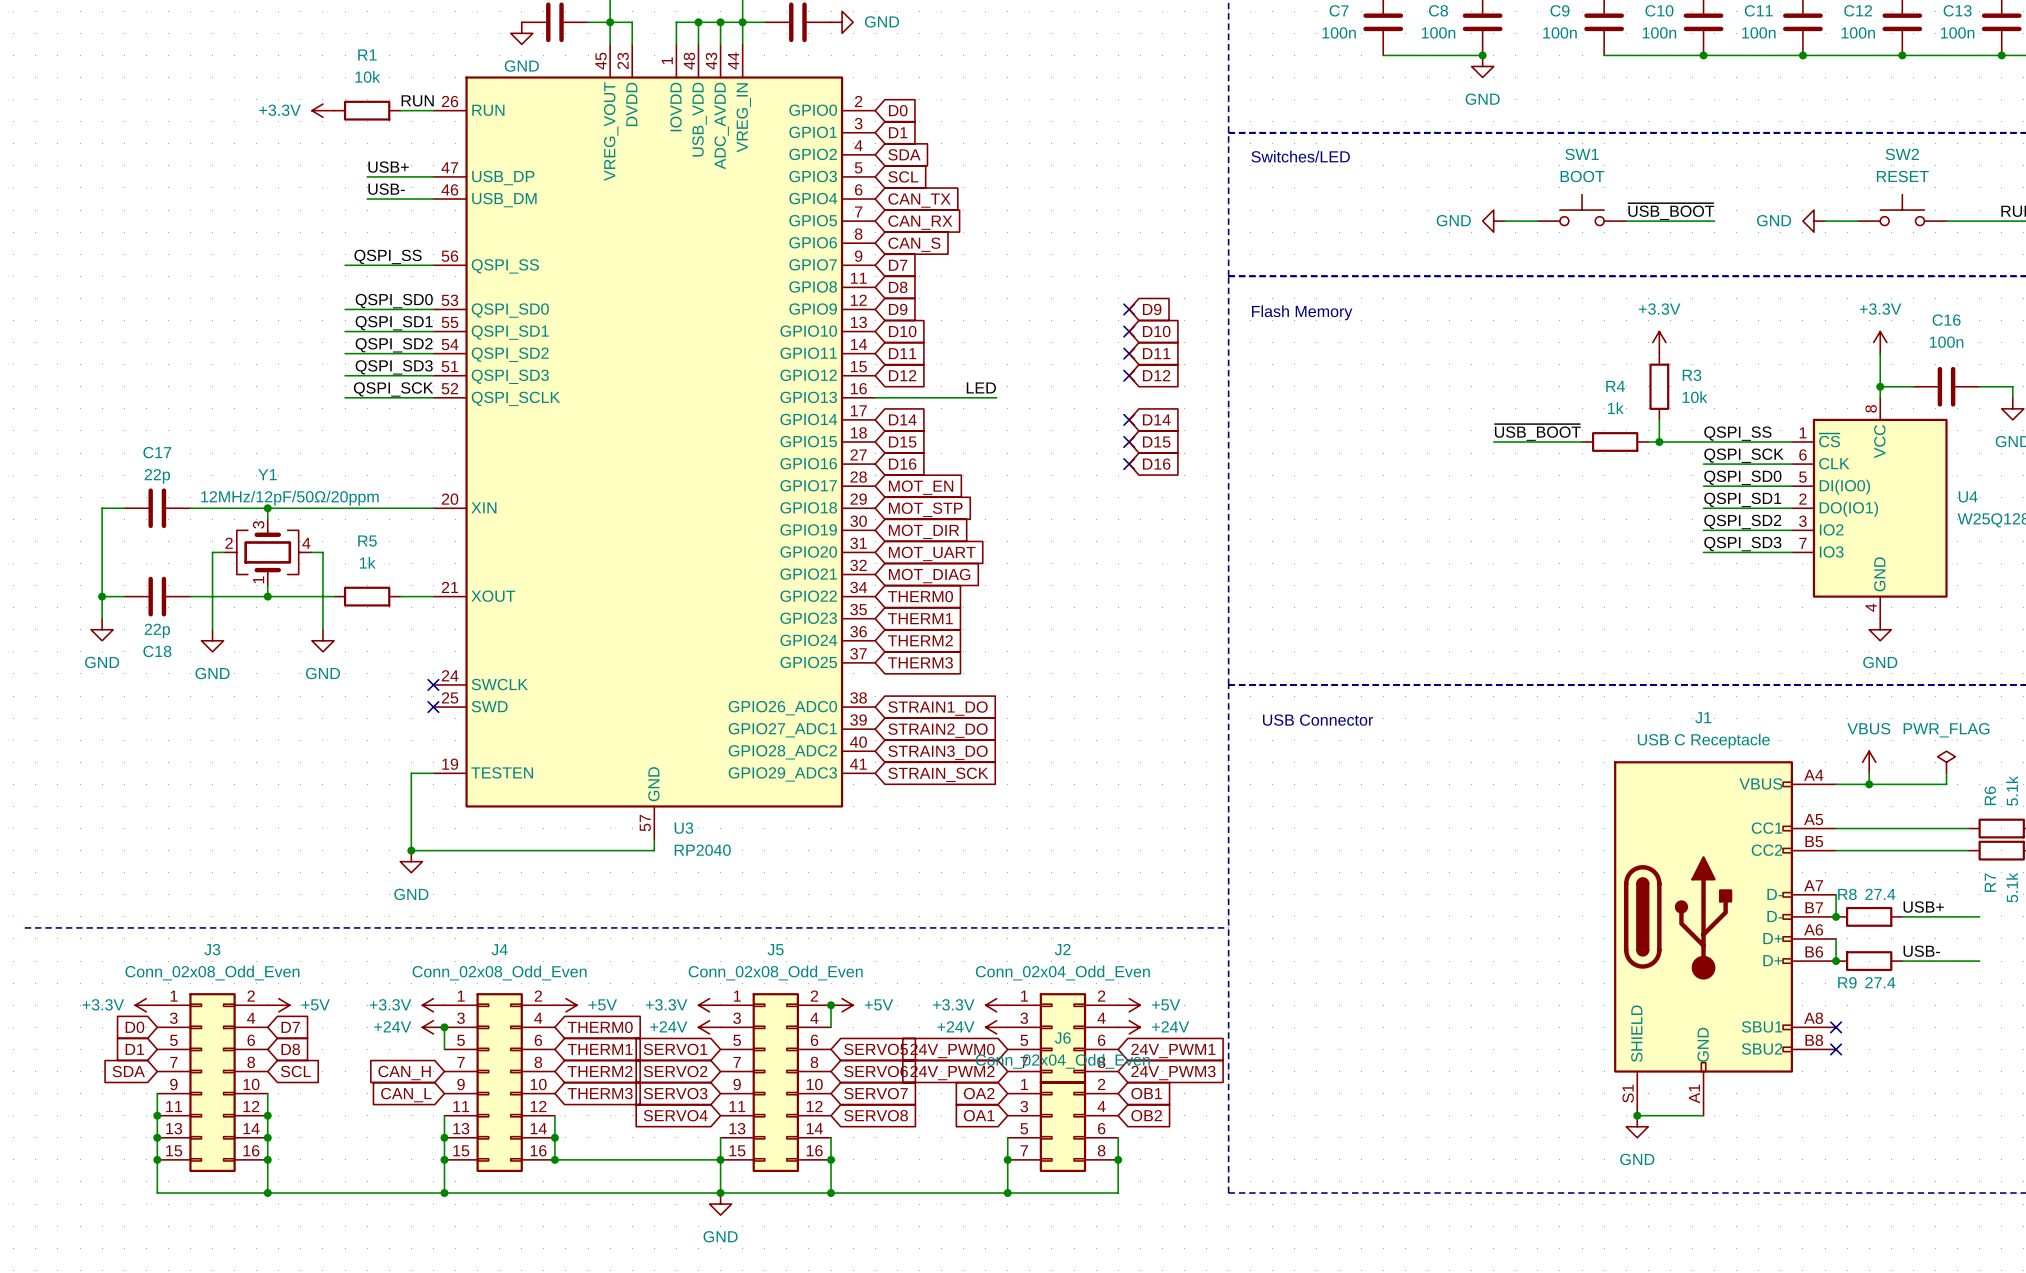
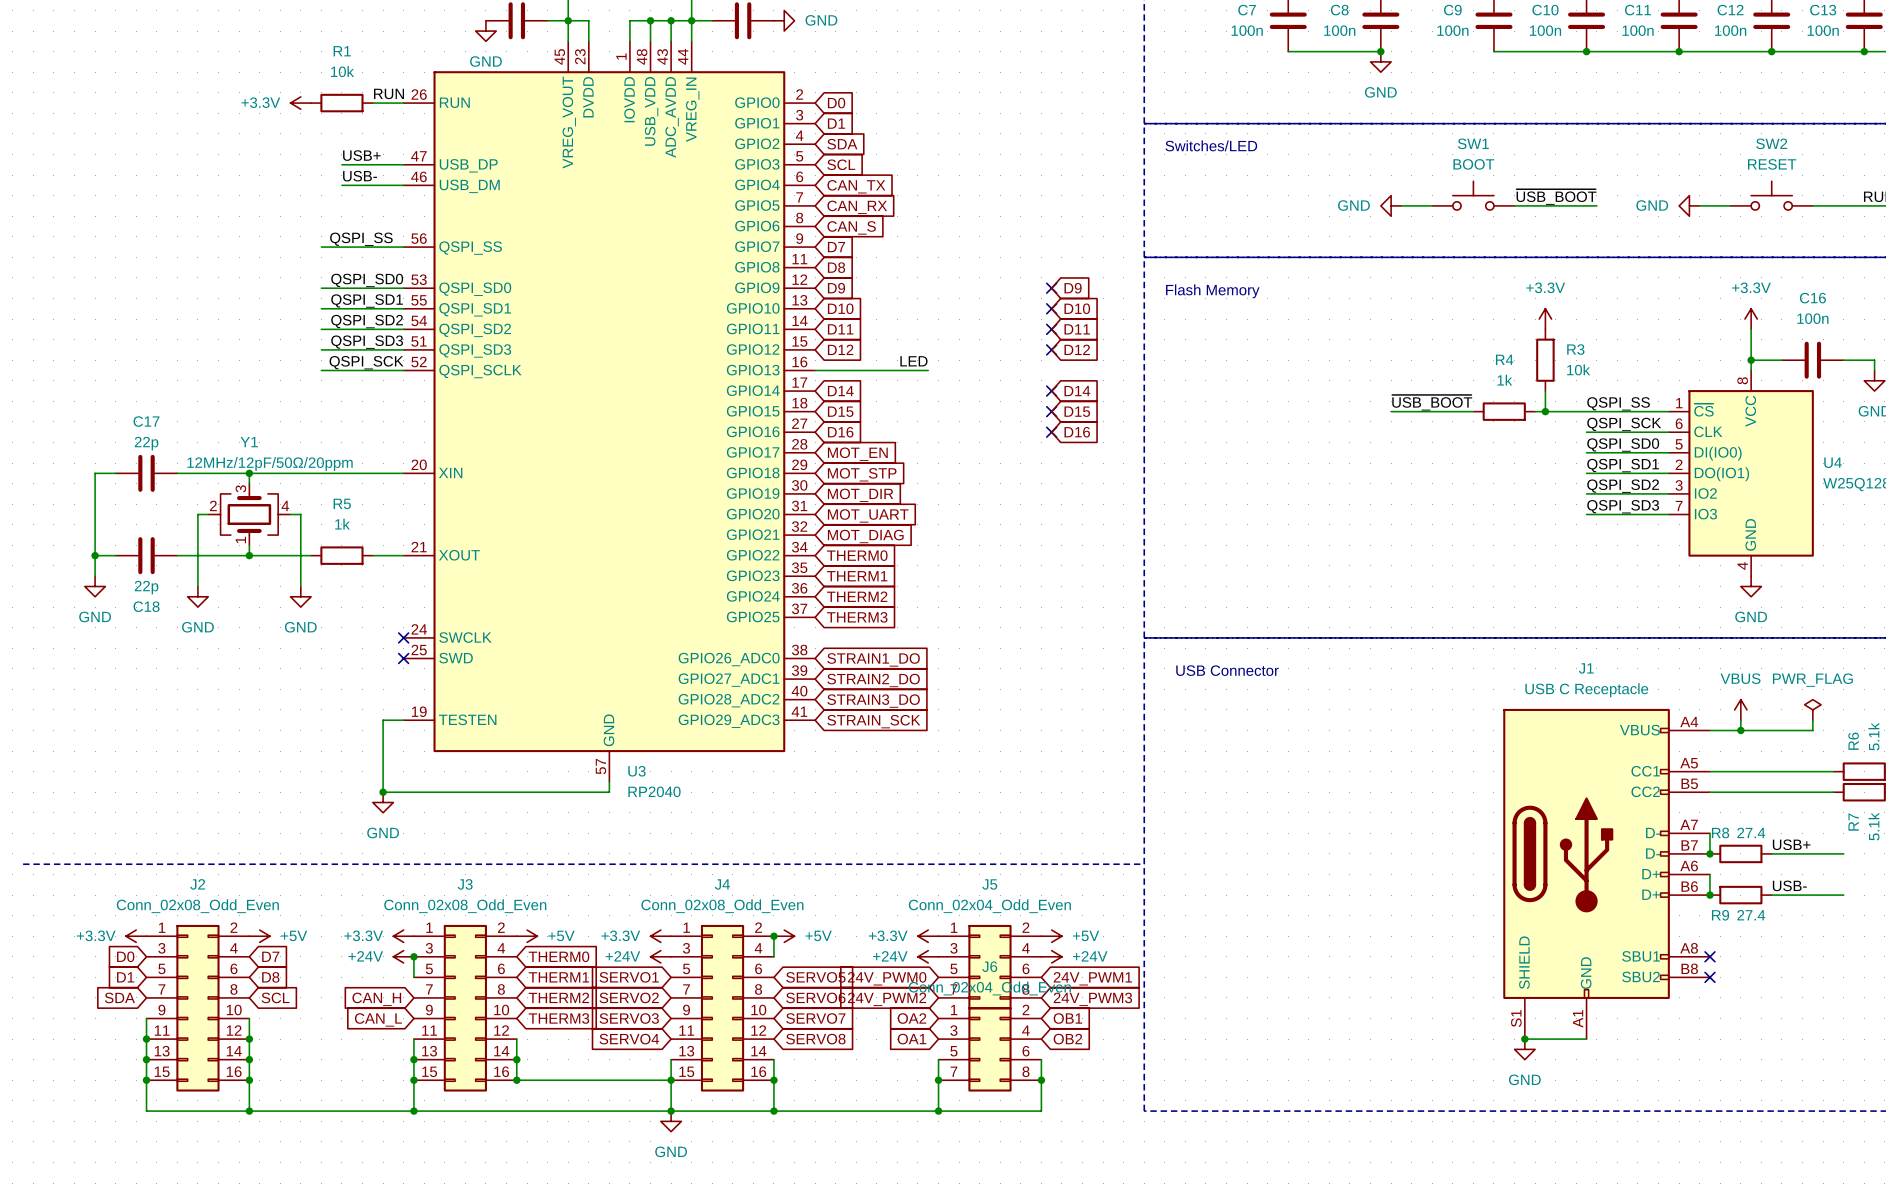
J3 name: J3 (212, 949) -> J2 (197, 884)
J4 name: J4 (499, 949) -> J3 (465, 884)
J5 name: J5 (775, 949) -> J4 (722, 884)
J2 name: J2 (1062, 949) -> J5 (989, 884)

